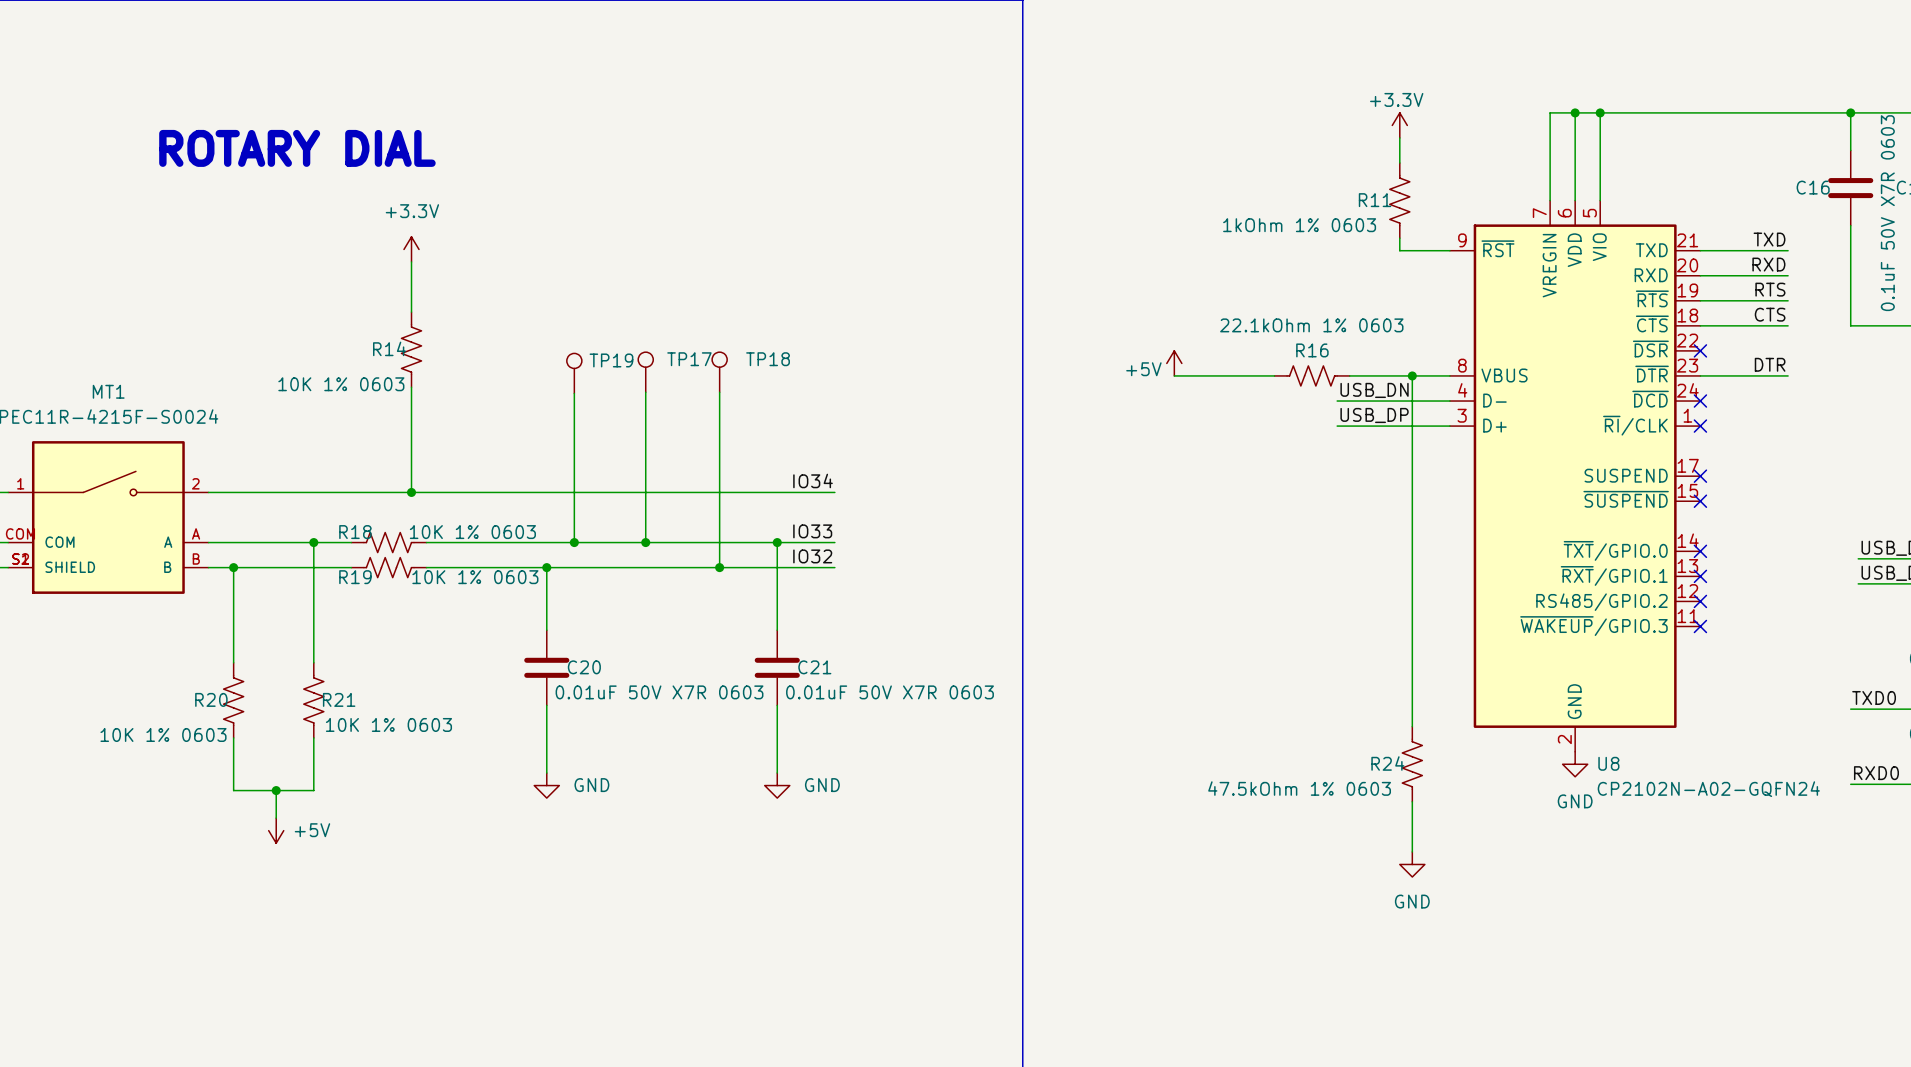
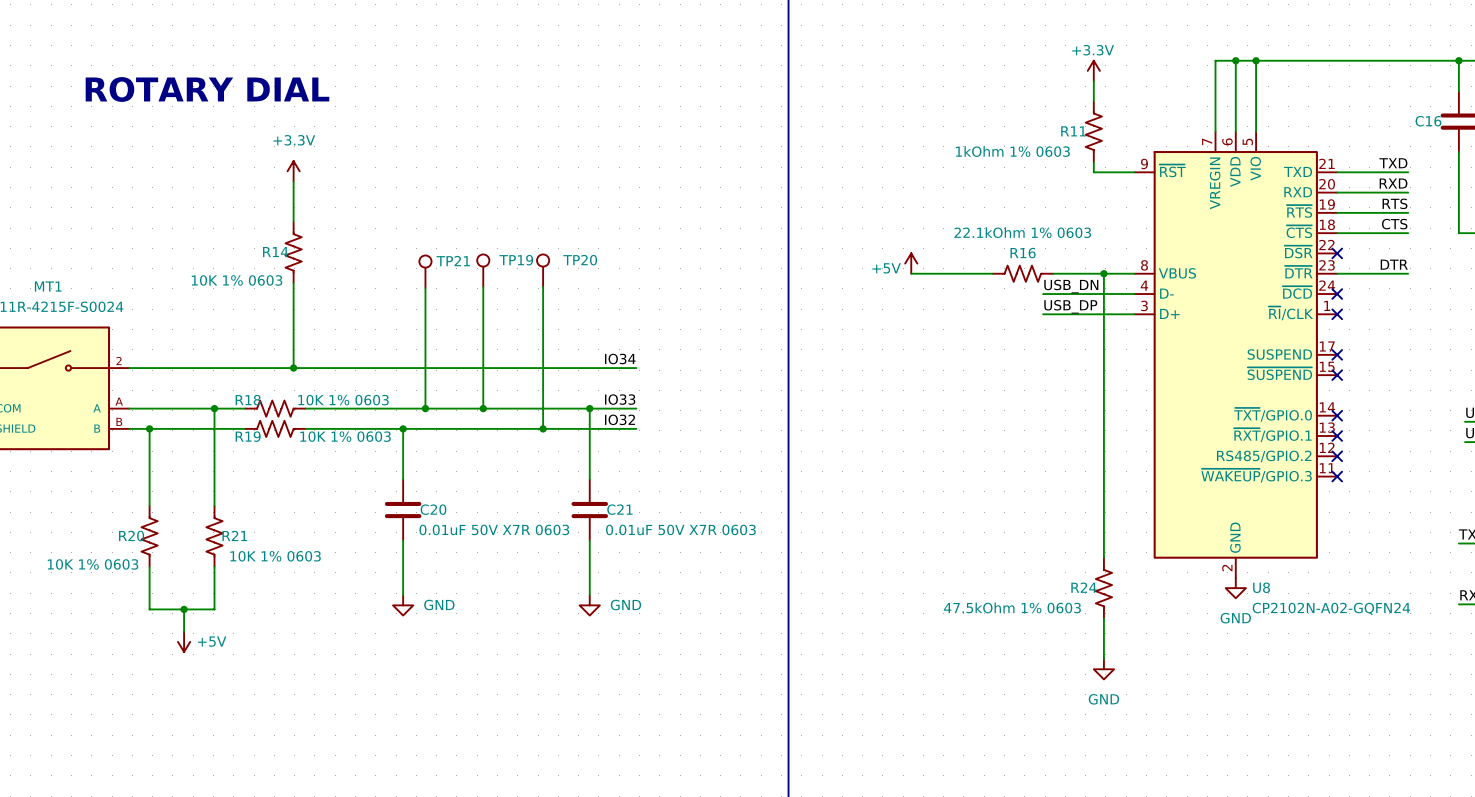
TP17 name: TP17 (689, 359) -> TP19 (516, 260)
TP18 name: TP18 (768, 359) -> TP20 (580, 260)
TP19 name: TP19 (611, 360) -> TP21 (453, 261)

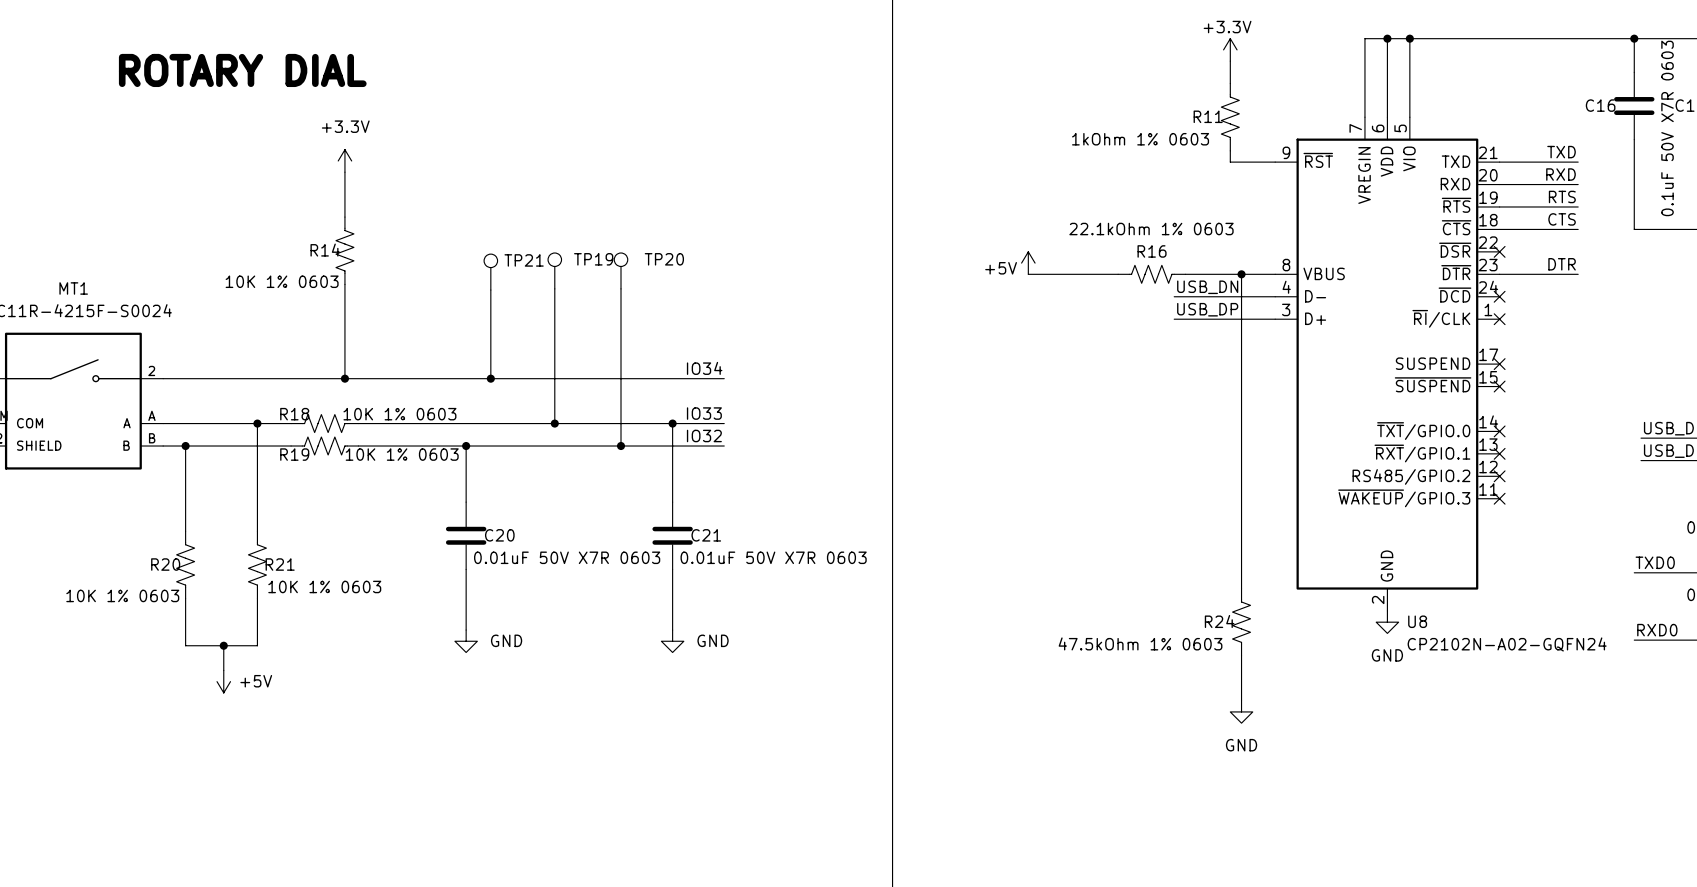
wire: (425, 368) (425, 408) -> none
junction position: (425, 408) -> (490, 378)

